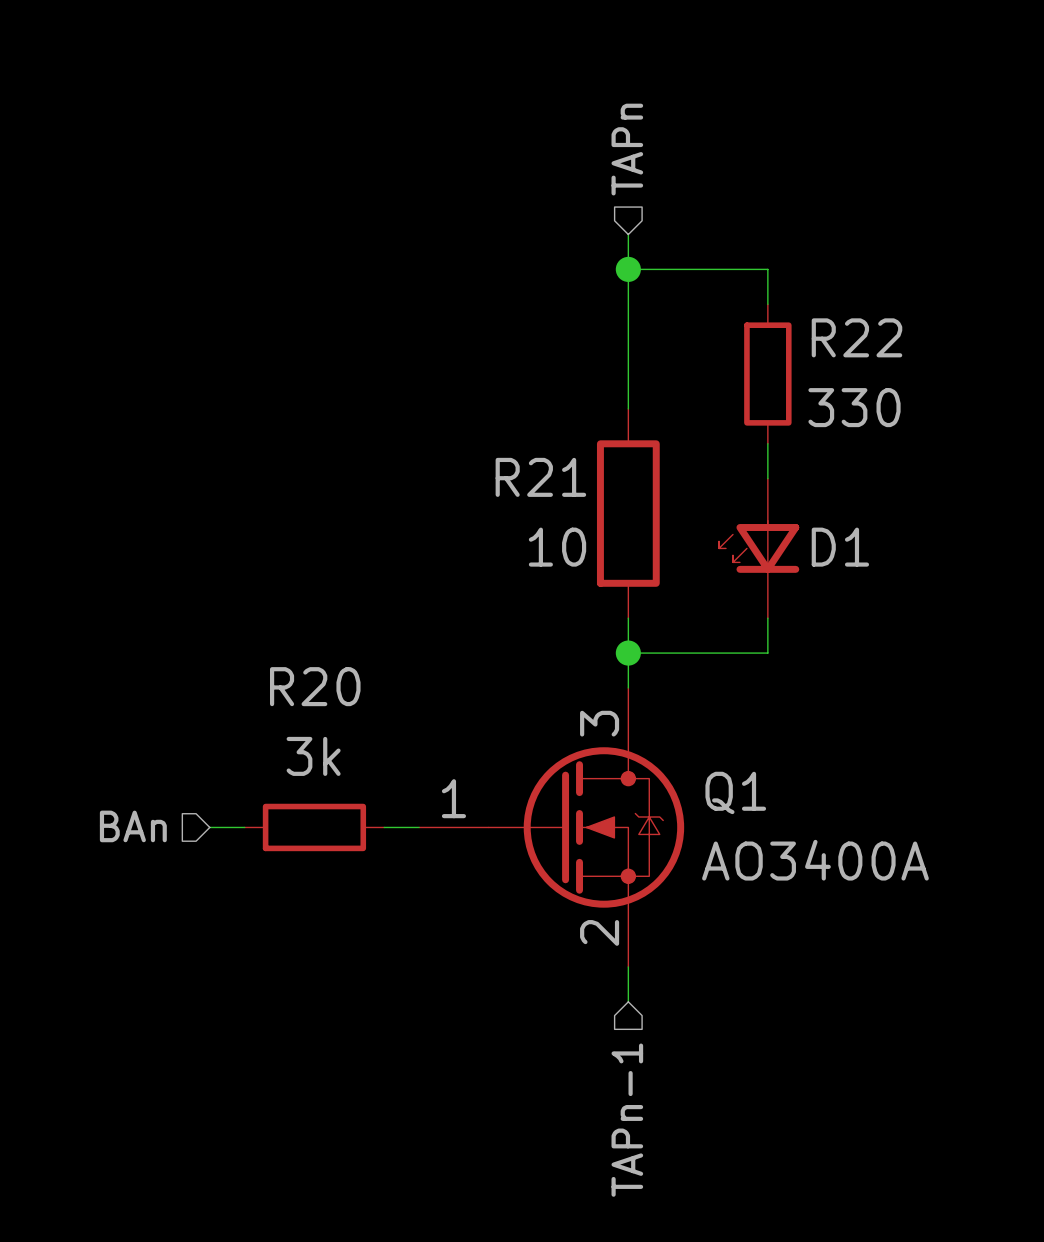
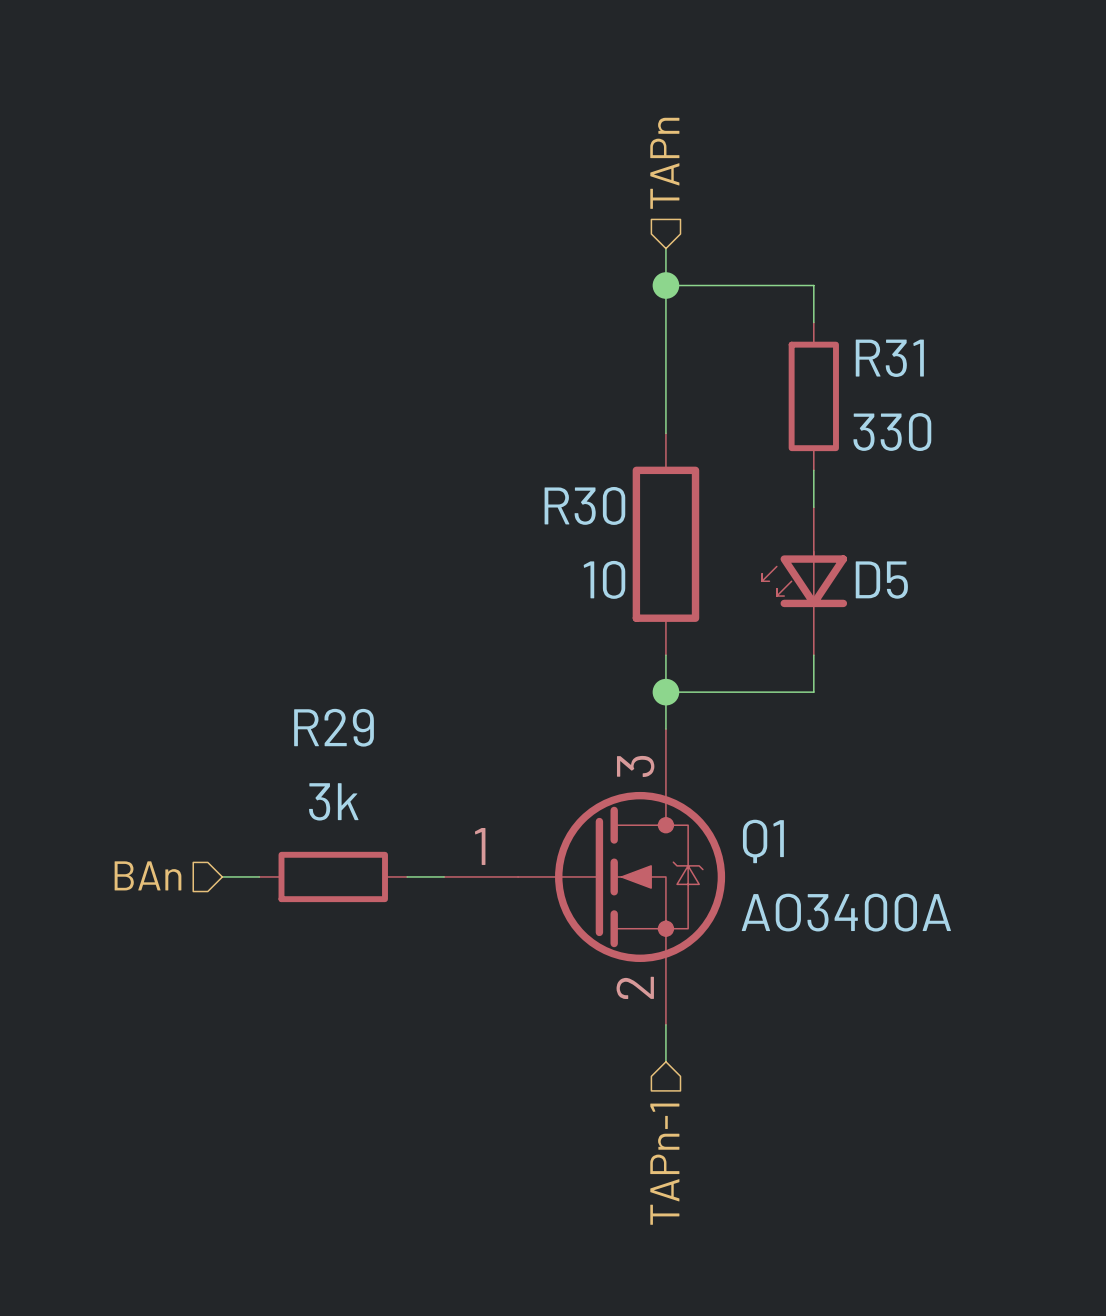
R22 name: R22 (856, 337) -> R31 (889, 358)
R21 name: R21 (540, 477) -> R30 (584, 505)
D1 name: D1 (840, 547) -> D5 (881, 580)
R20 name: R20 (315, 686) -> R29 (334, 727)

